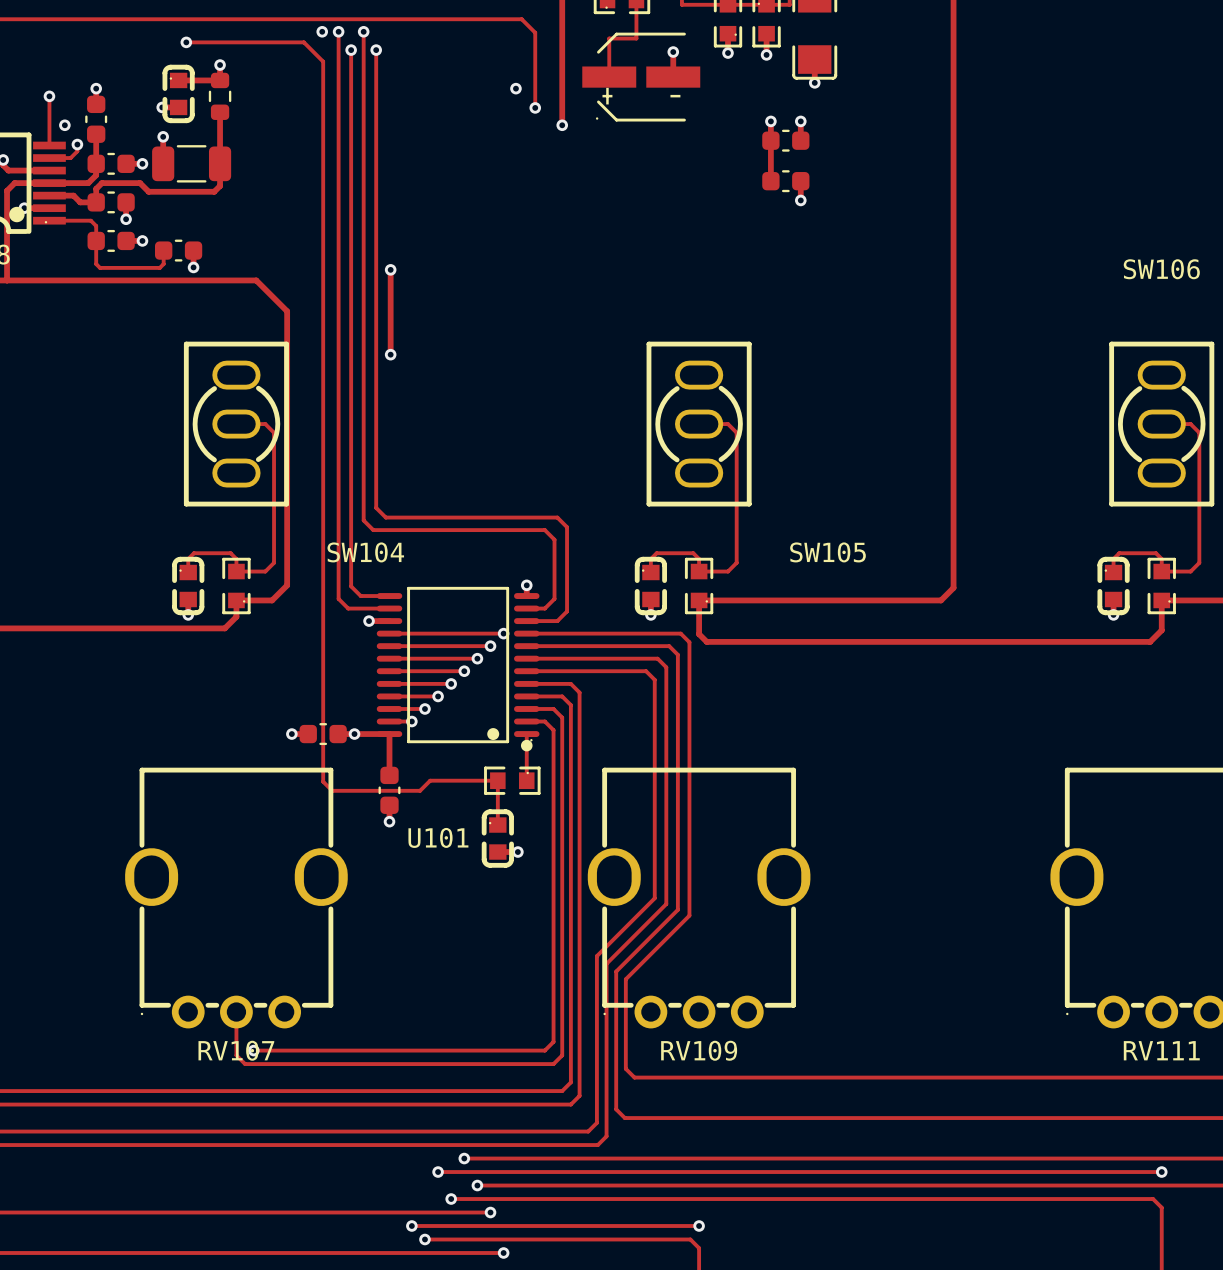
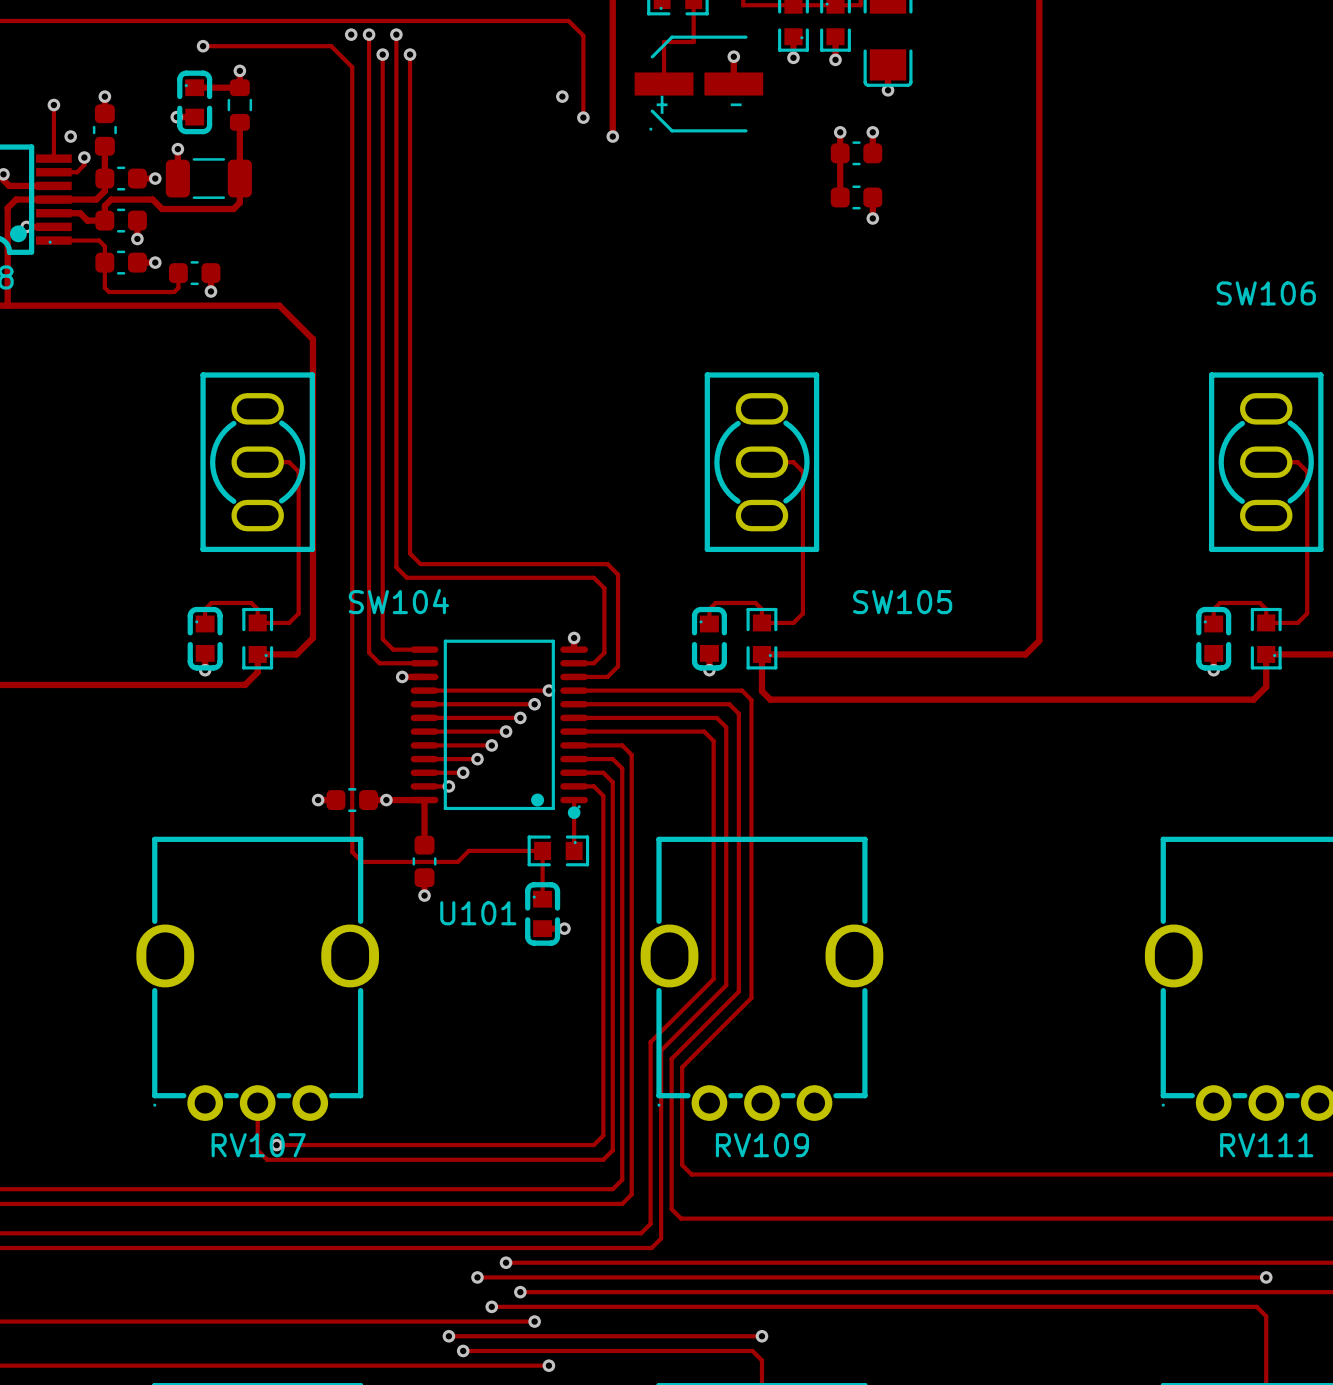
track: (390, 269) (390, 354) -> none
via: (390, 269) -> none
via: (390, 354) -> none

